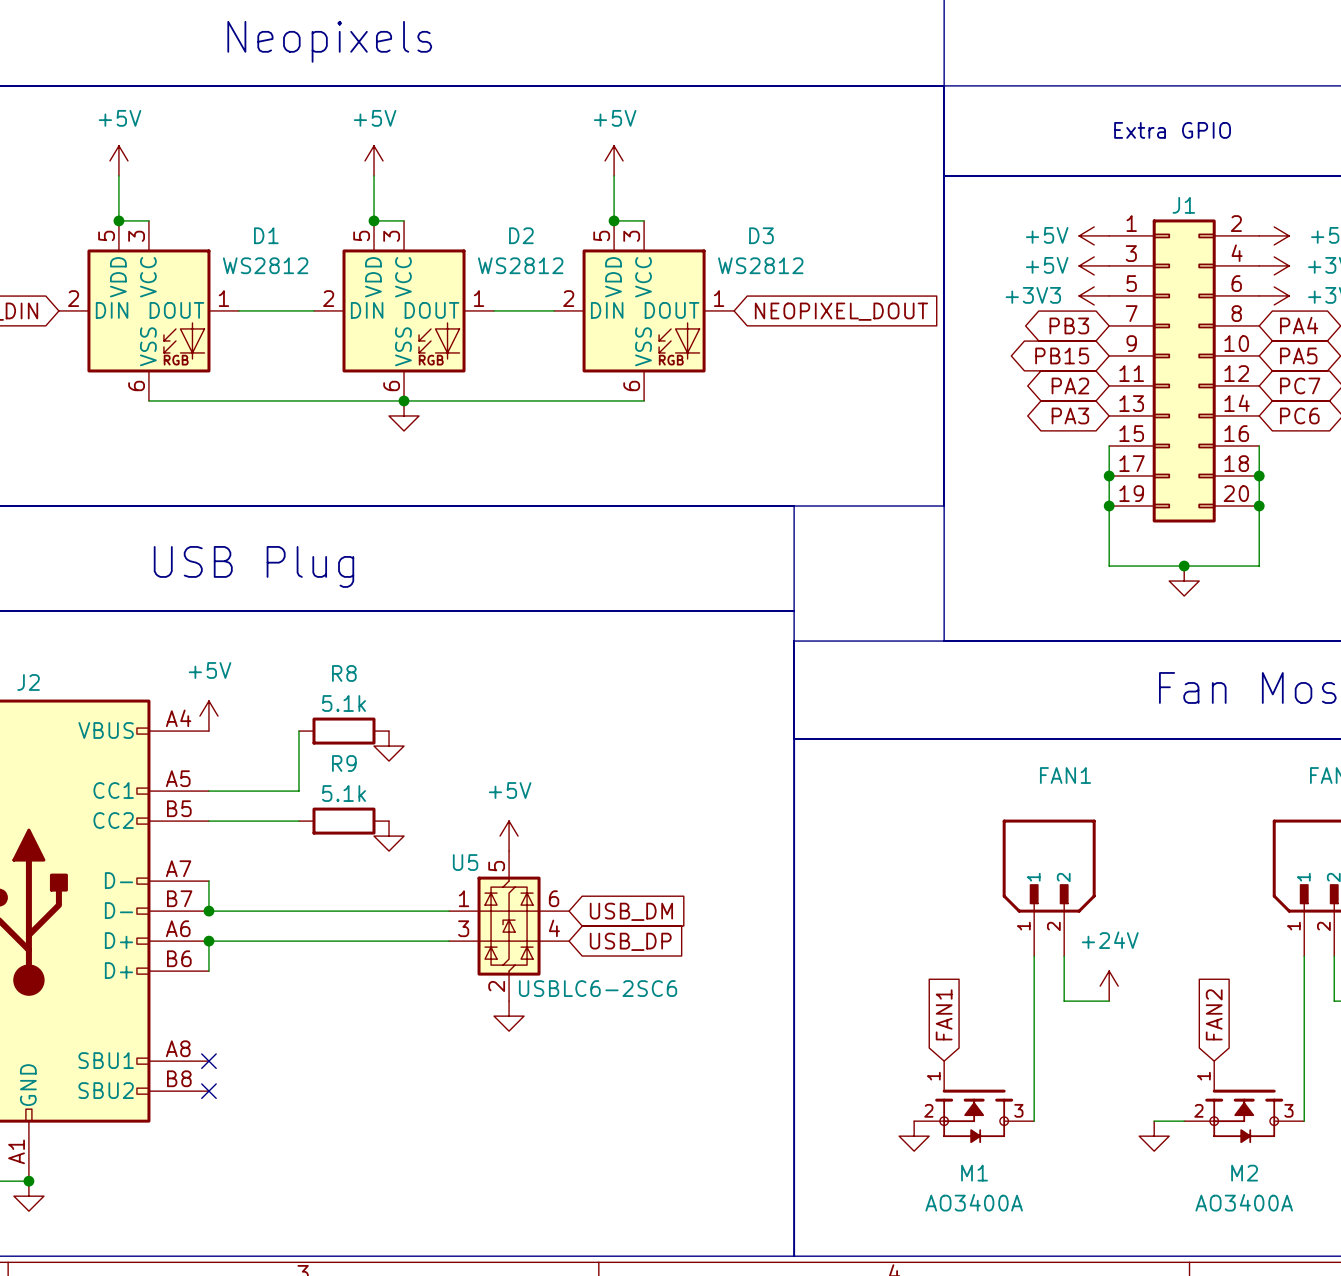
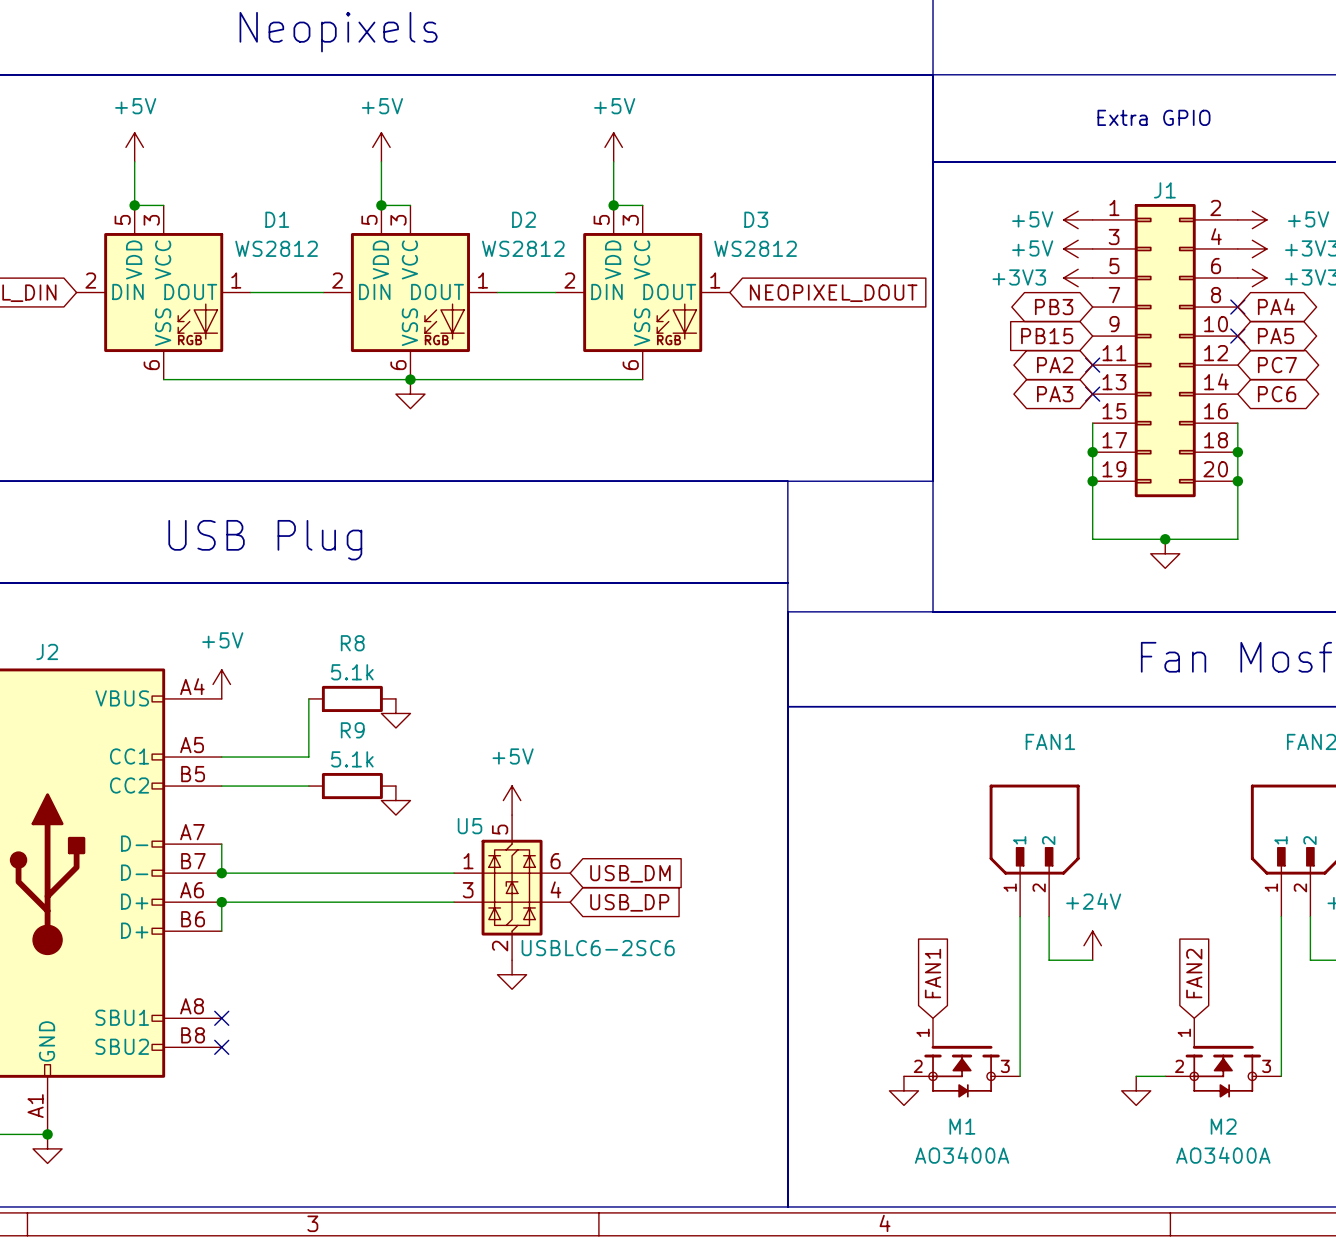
no-connect mark: none -> (1237, 307)
global label shape: bidirectional (1062, 355) -> input (1047, 336)
no-connect mark: none -> (1237, 336)
no-connect mark: none -> (1092, 365)
no-connect mark: none -> (1092, 394)

